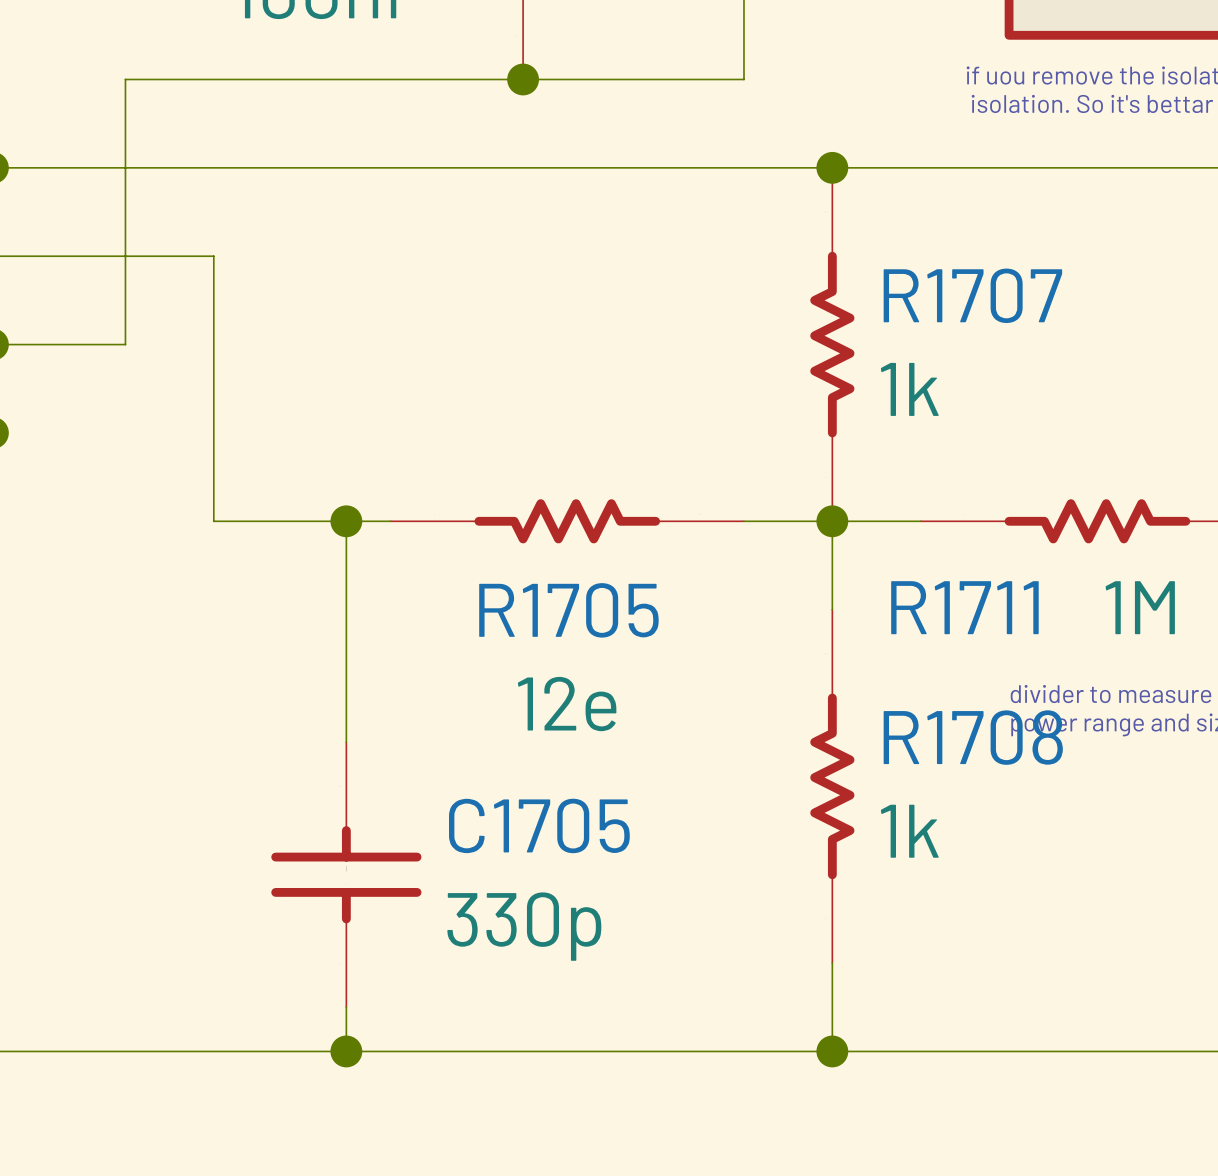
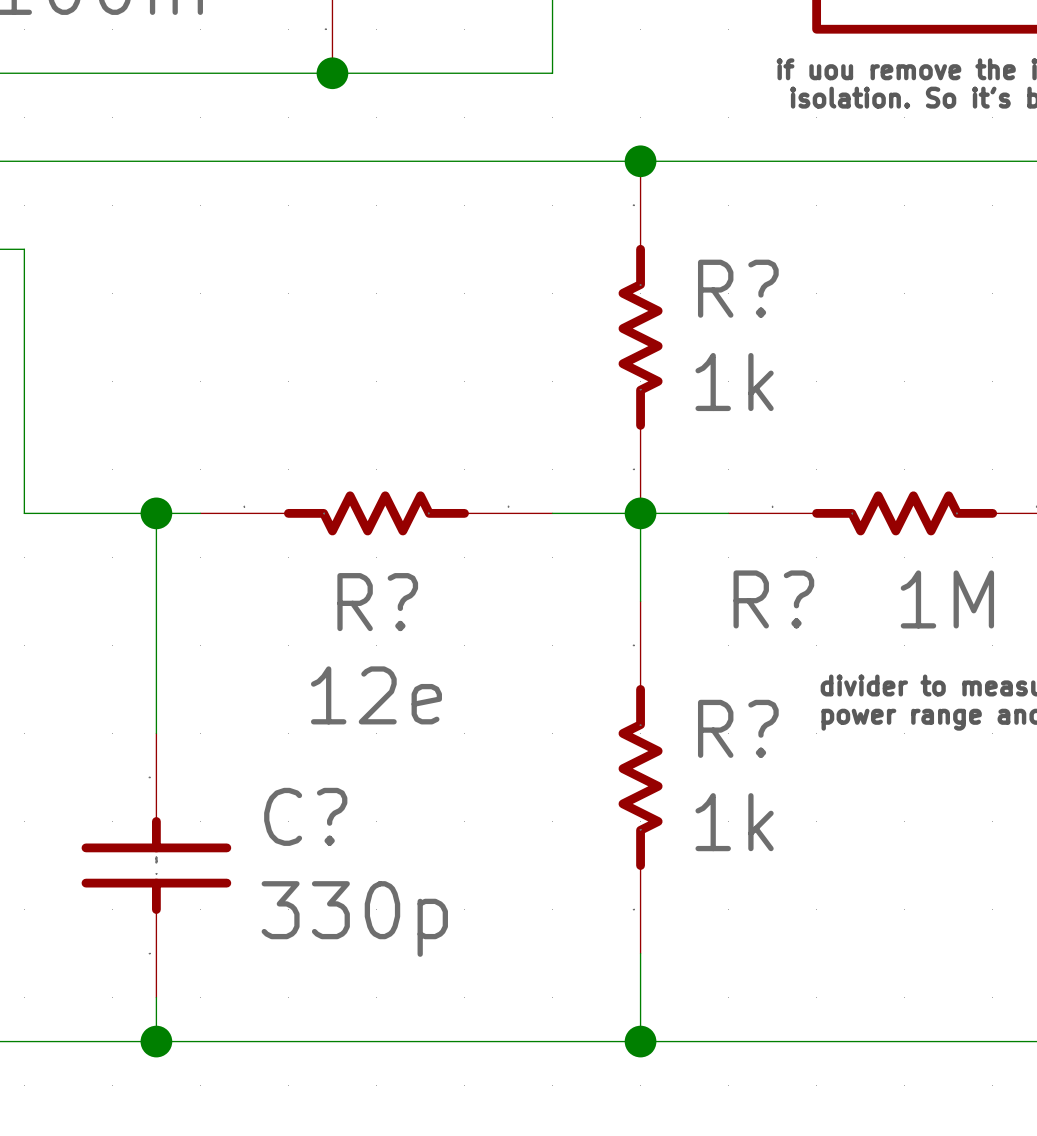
R1707 name: R1707 (972, 295) -> R? (738, 288)
R1711 name: R1711 (964, 607) -> R? (773, 599)
R1705 name: R1705 (568, 610) -> R? (377, 602)
R1708 name: R1708 (973, 737) -> R? (738, 728)
C1705 name: C1705 (539, 825) -> C? (305, 816)

